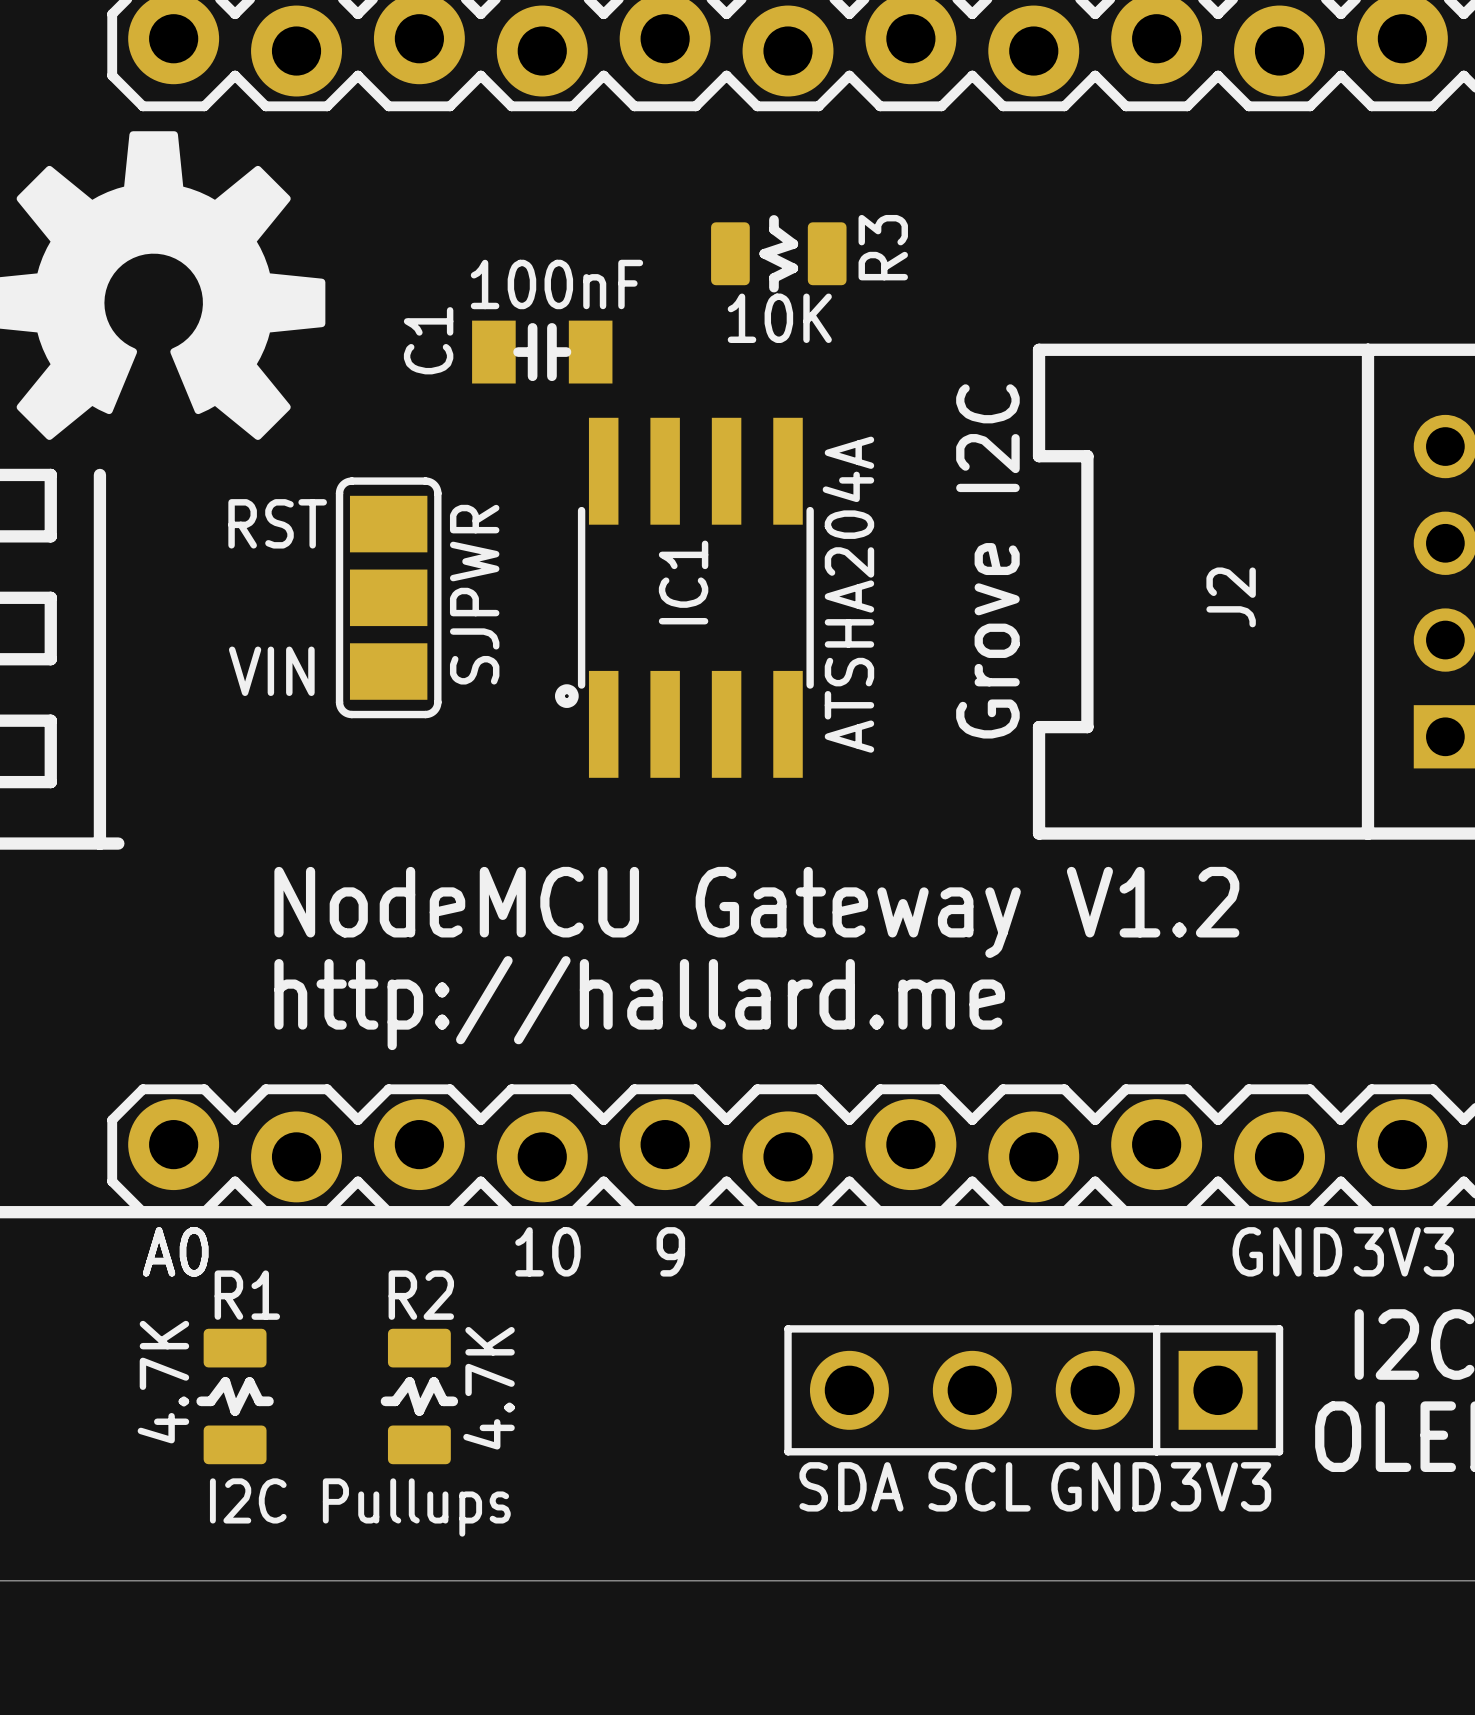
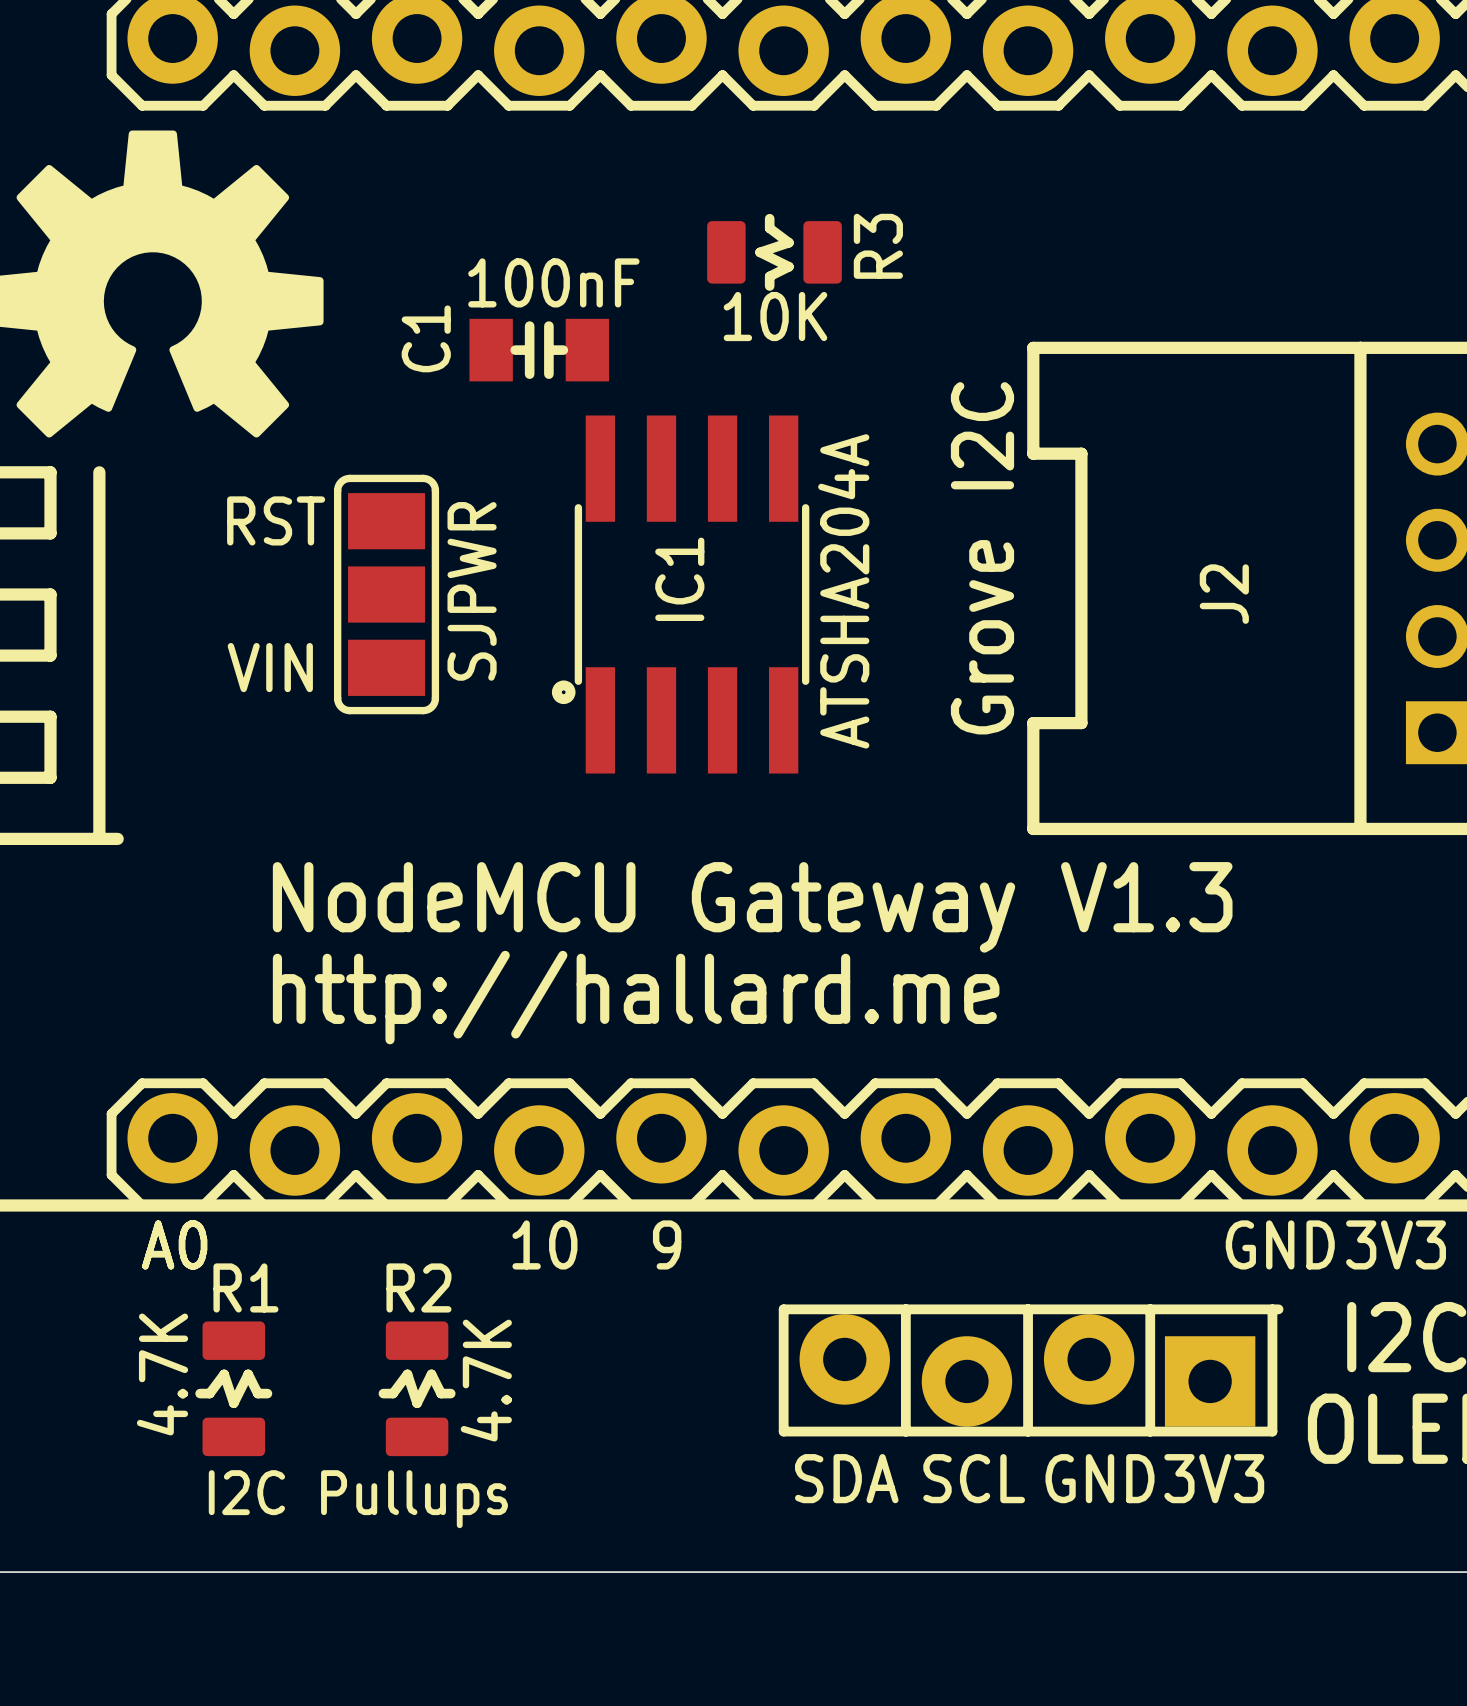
text: NodeMCU Gateway V1.2 (756, 912) -> NodeMCU Gateway V1.3 (752, 907)
part footprint: [784, 1325, 1284, 1456] -> [778, 1304, 1284, 1437]

